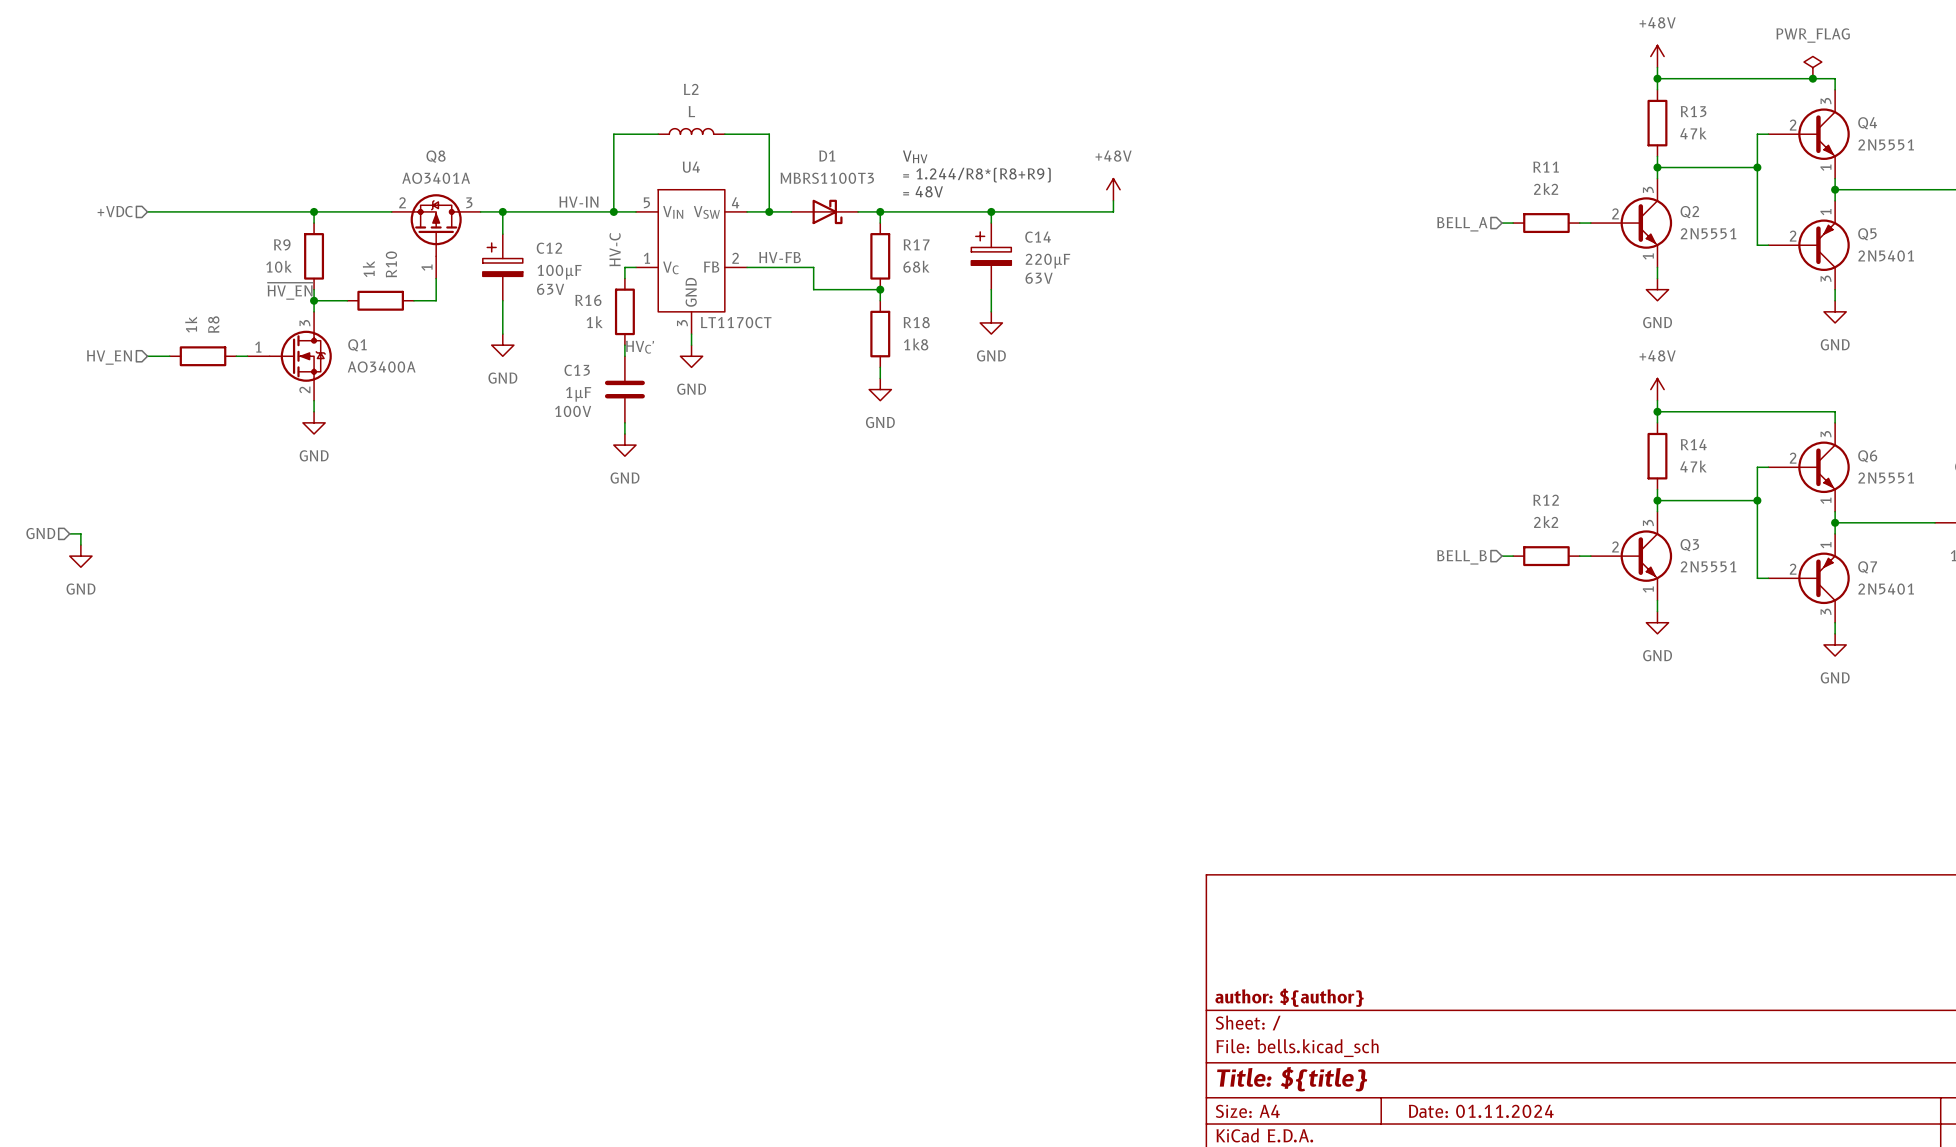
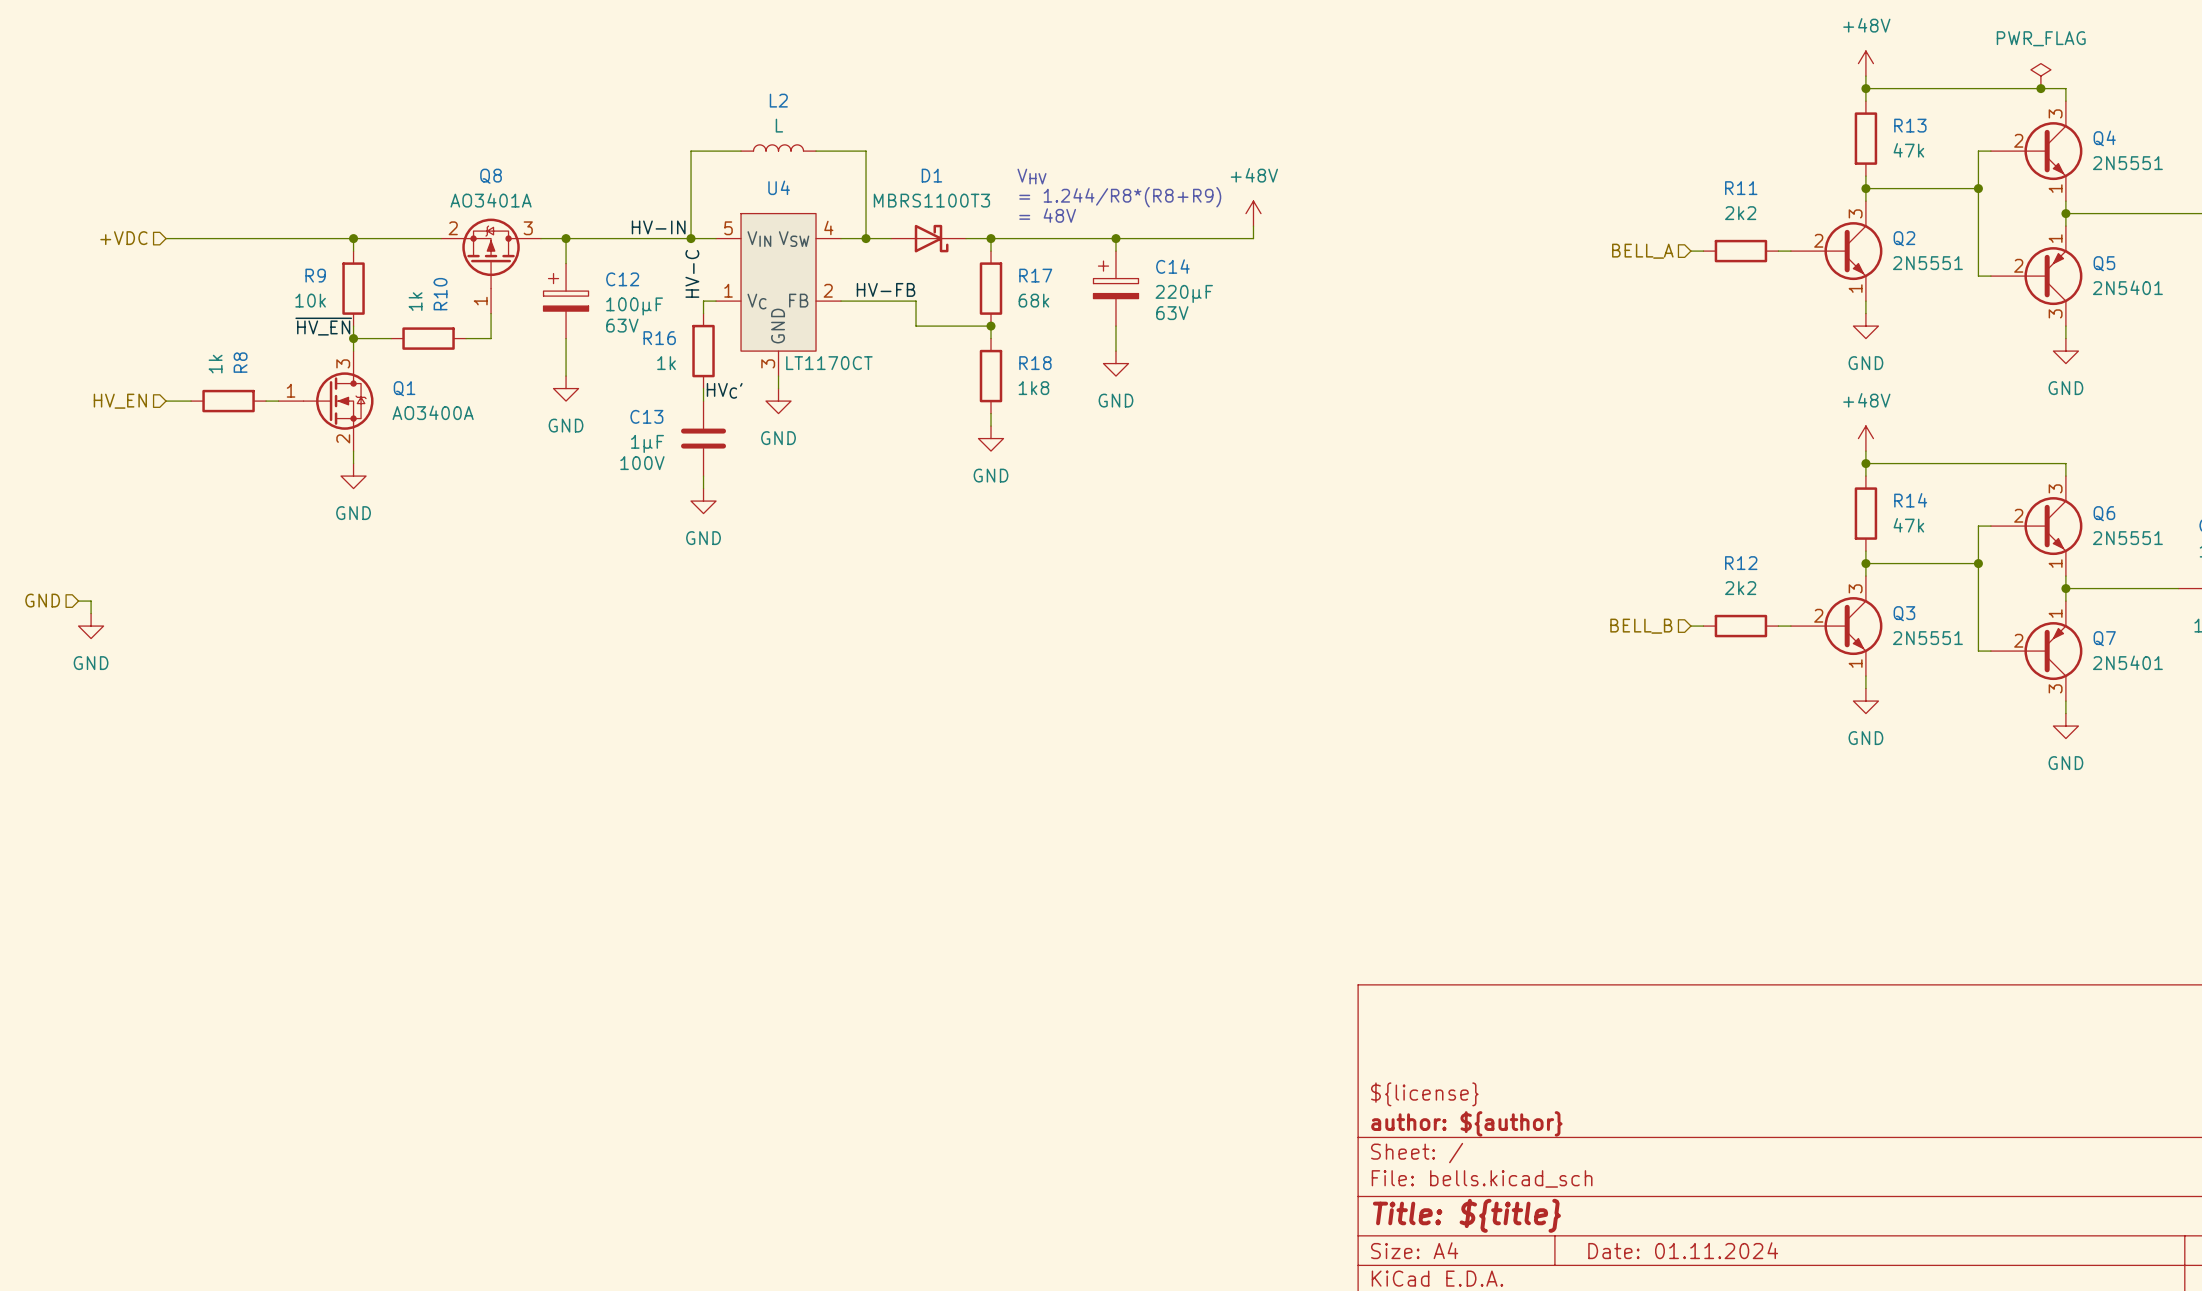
title block: none -> ${license} (1424, 1094)

